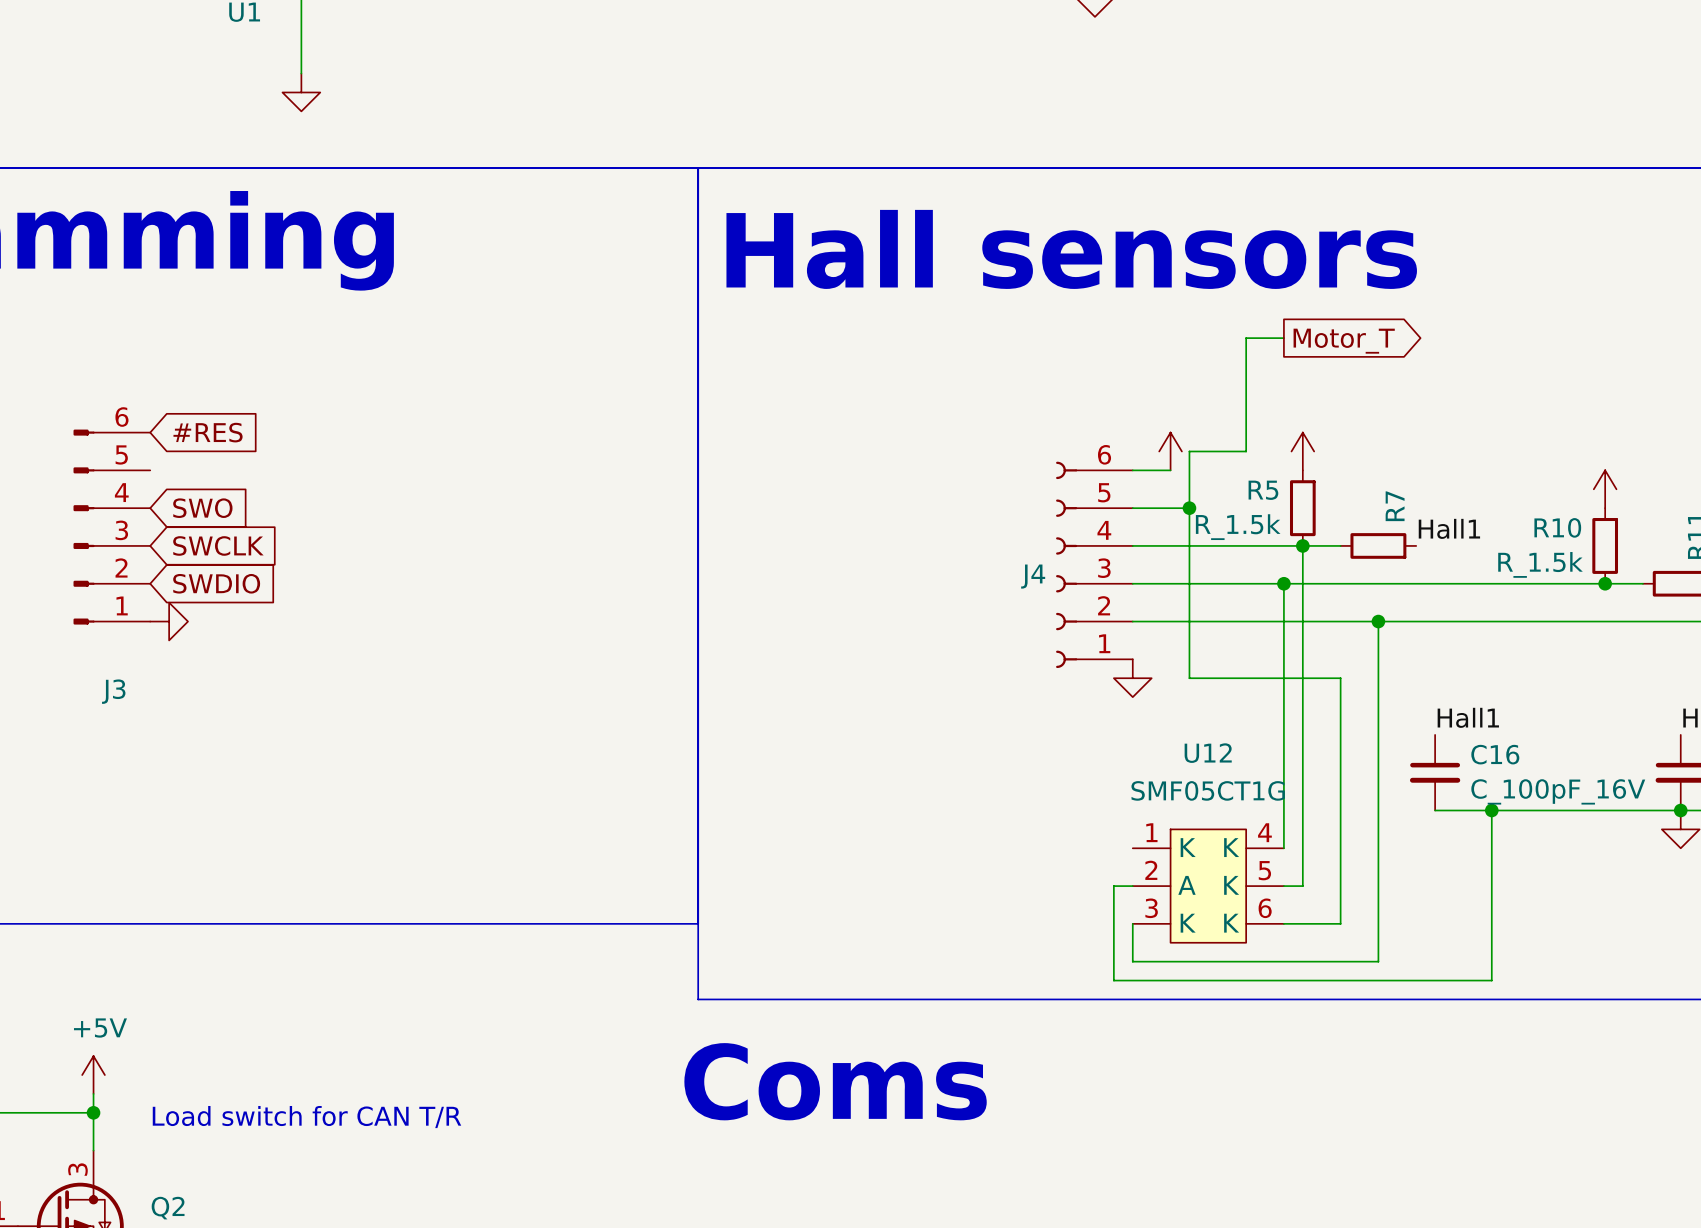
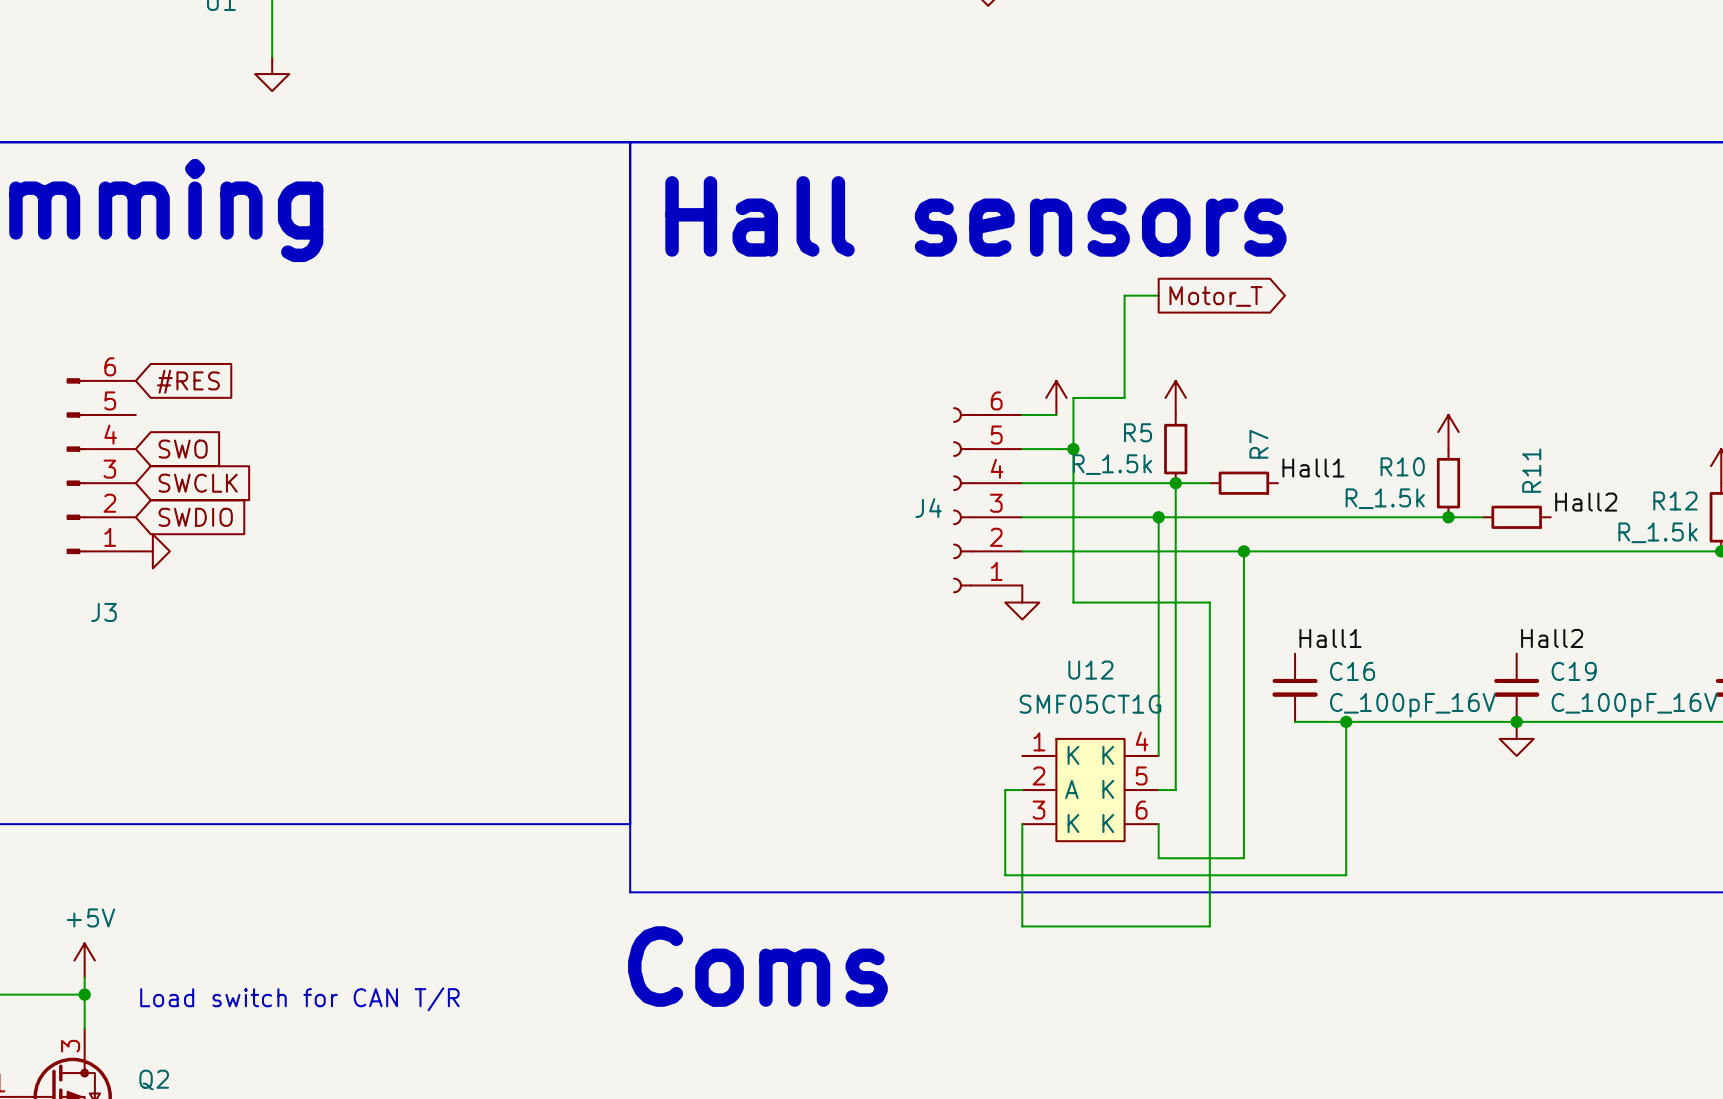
wire: (1283, 923) (1340, 923) -> (1158, 824) (1158, 858)
wire: (1132, 961) (1283, 961) -> (1022, 858) (1022, 926) (1209, 926) (1209, 824)

